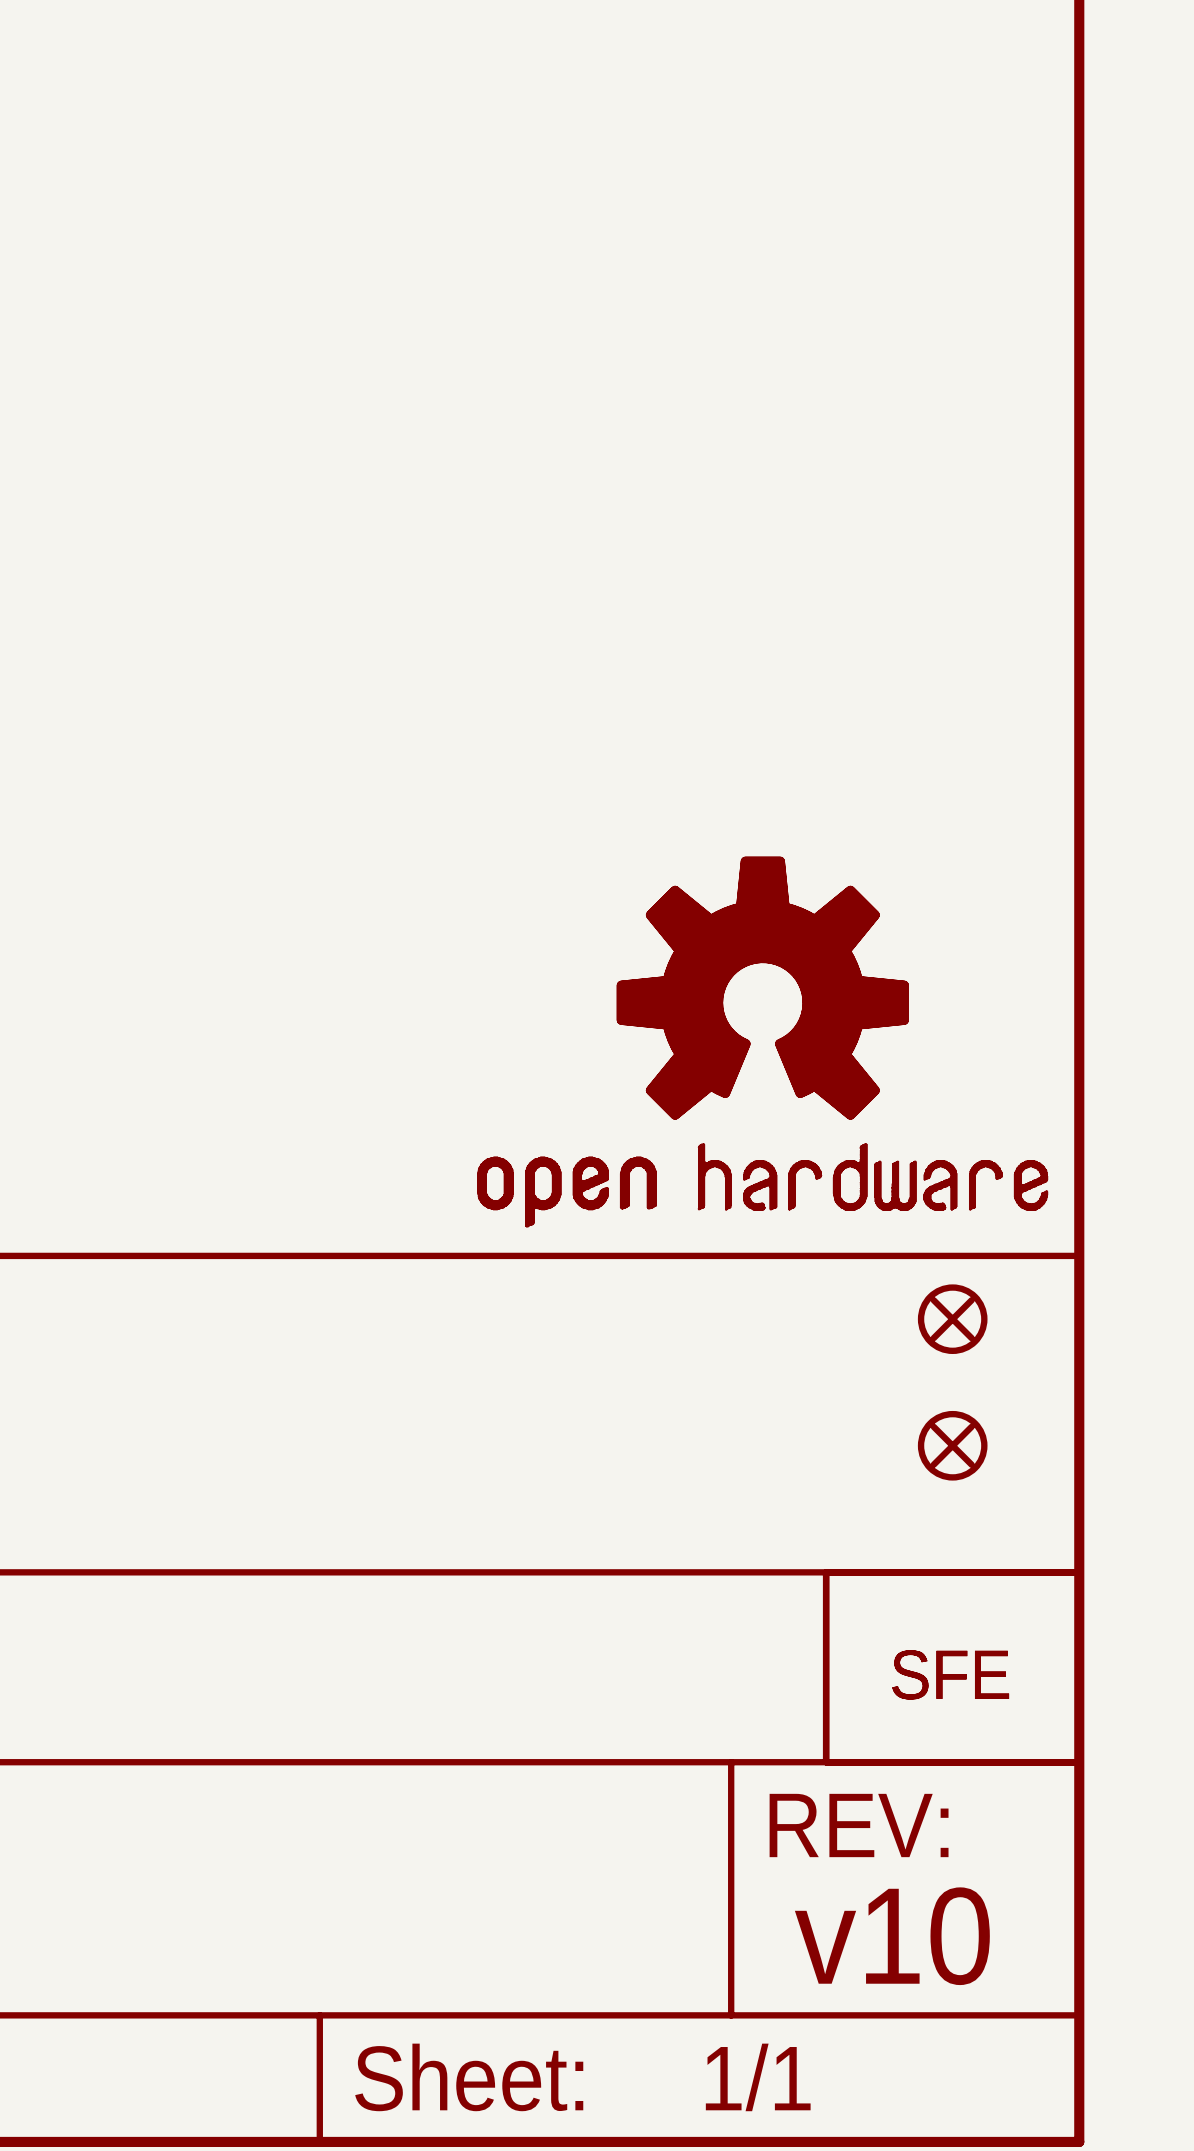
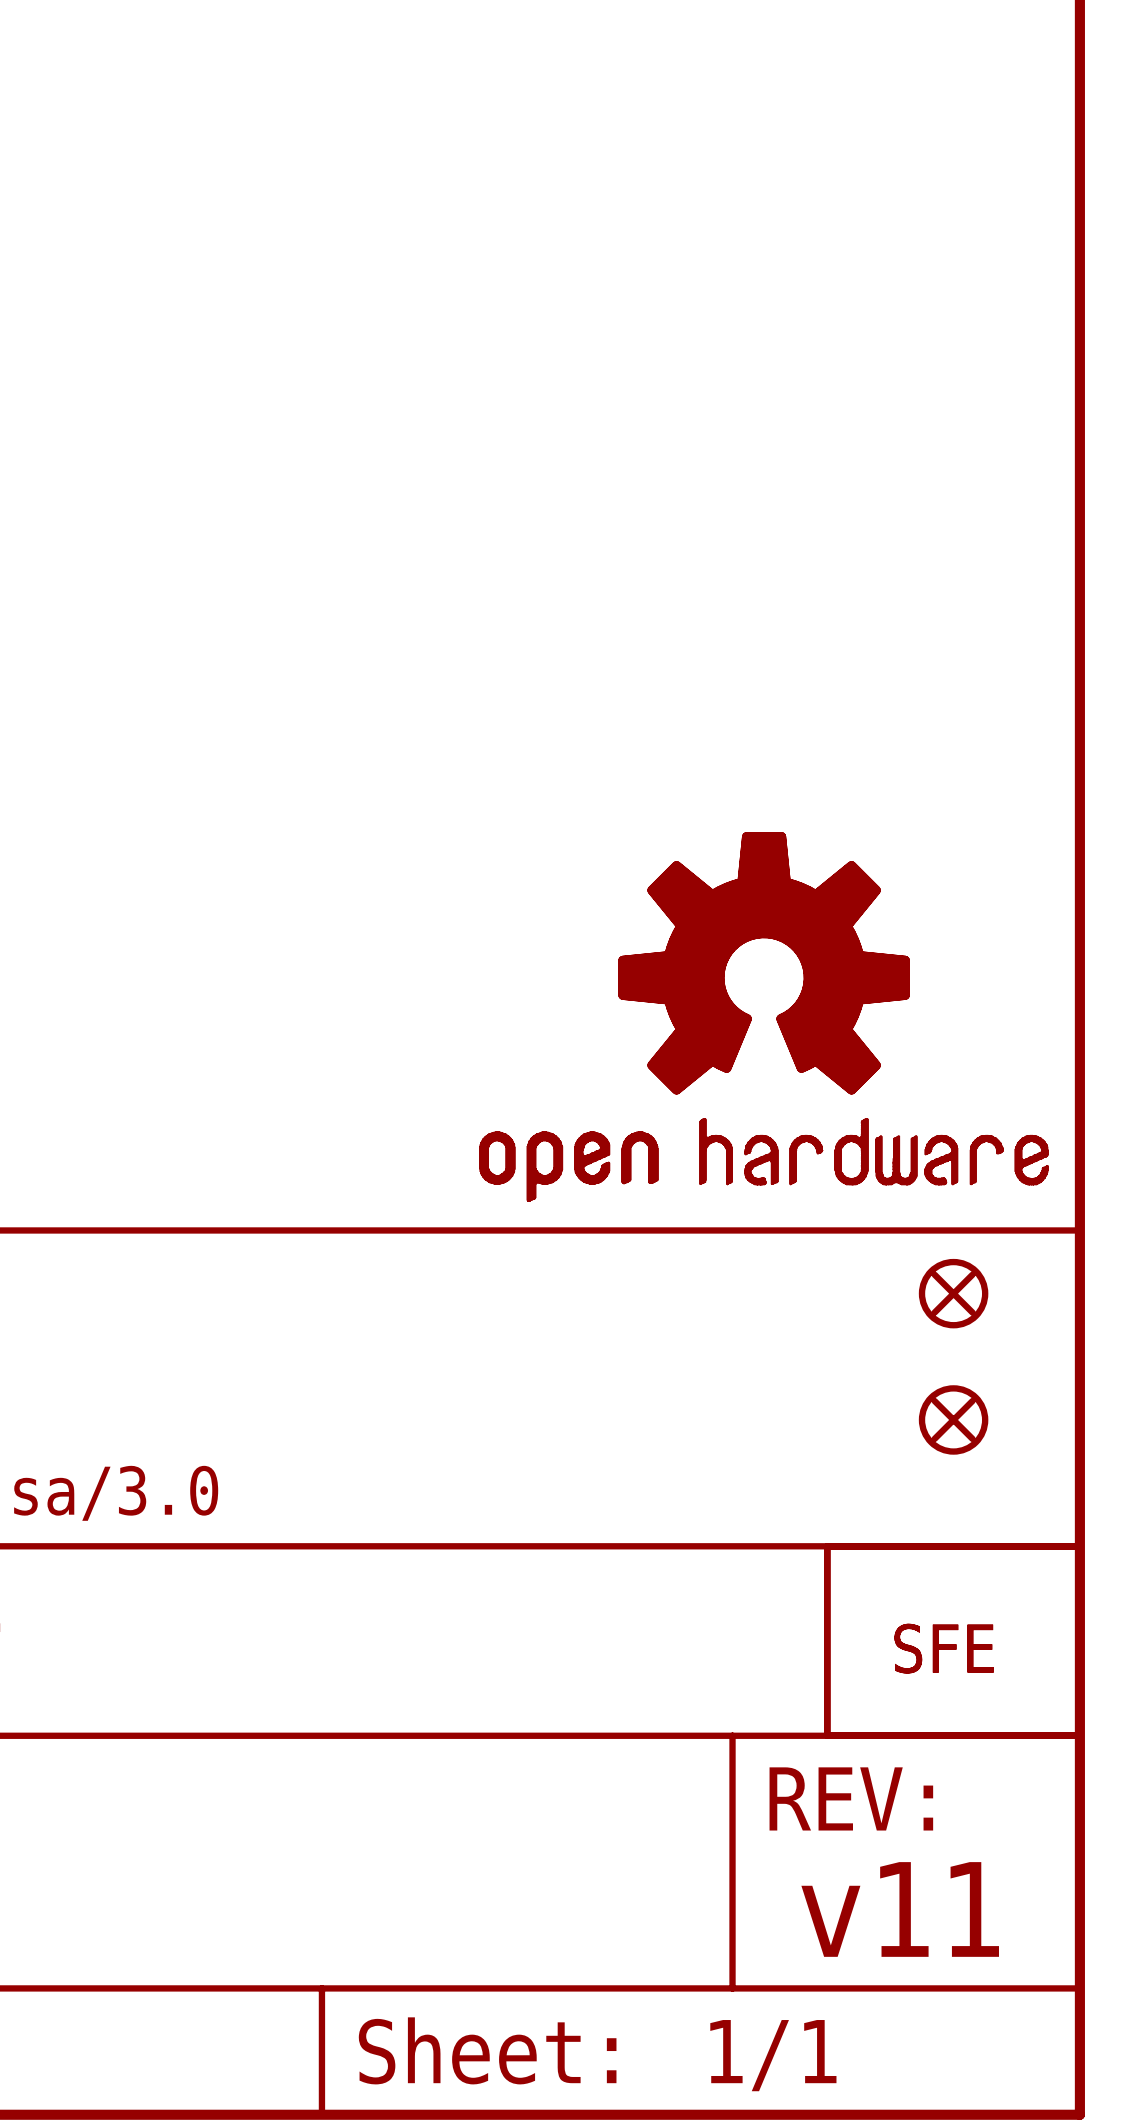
text: v10 (892, 1936) -> v11 (900, 1909)

